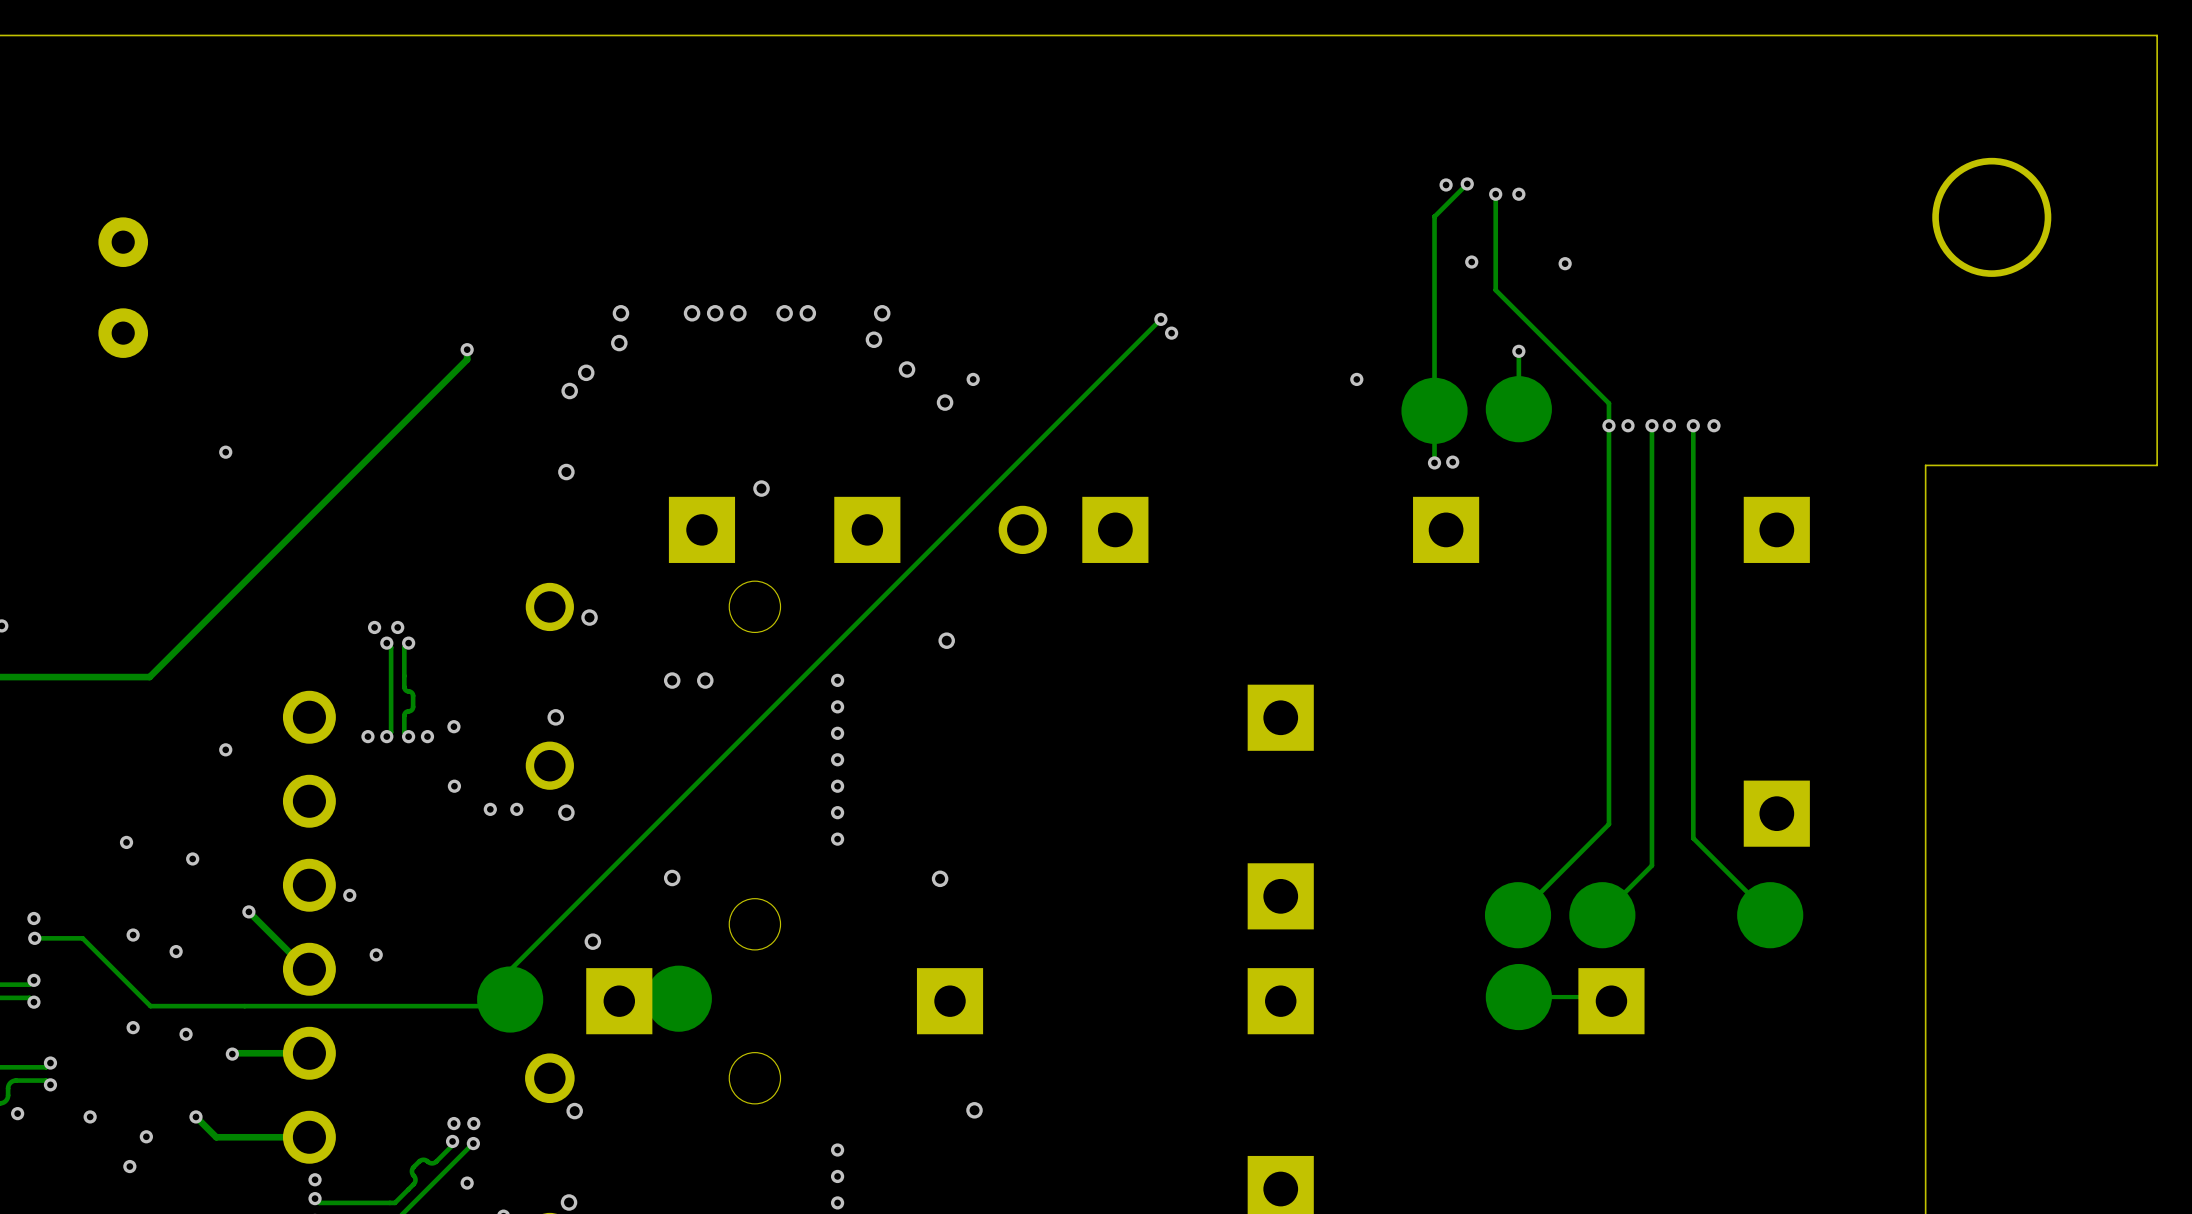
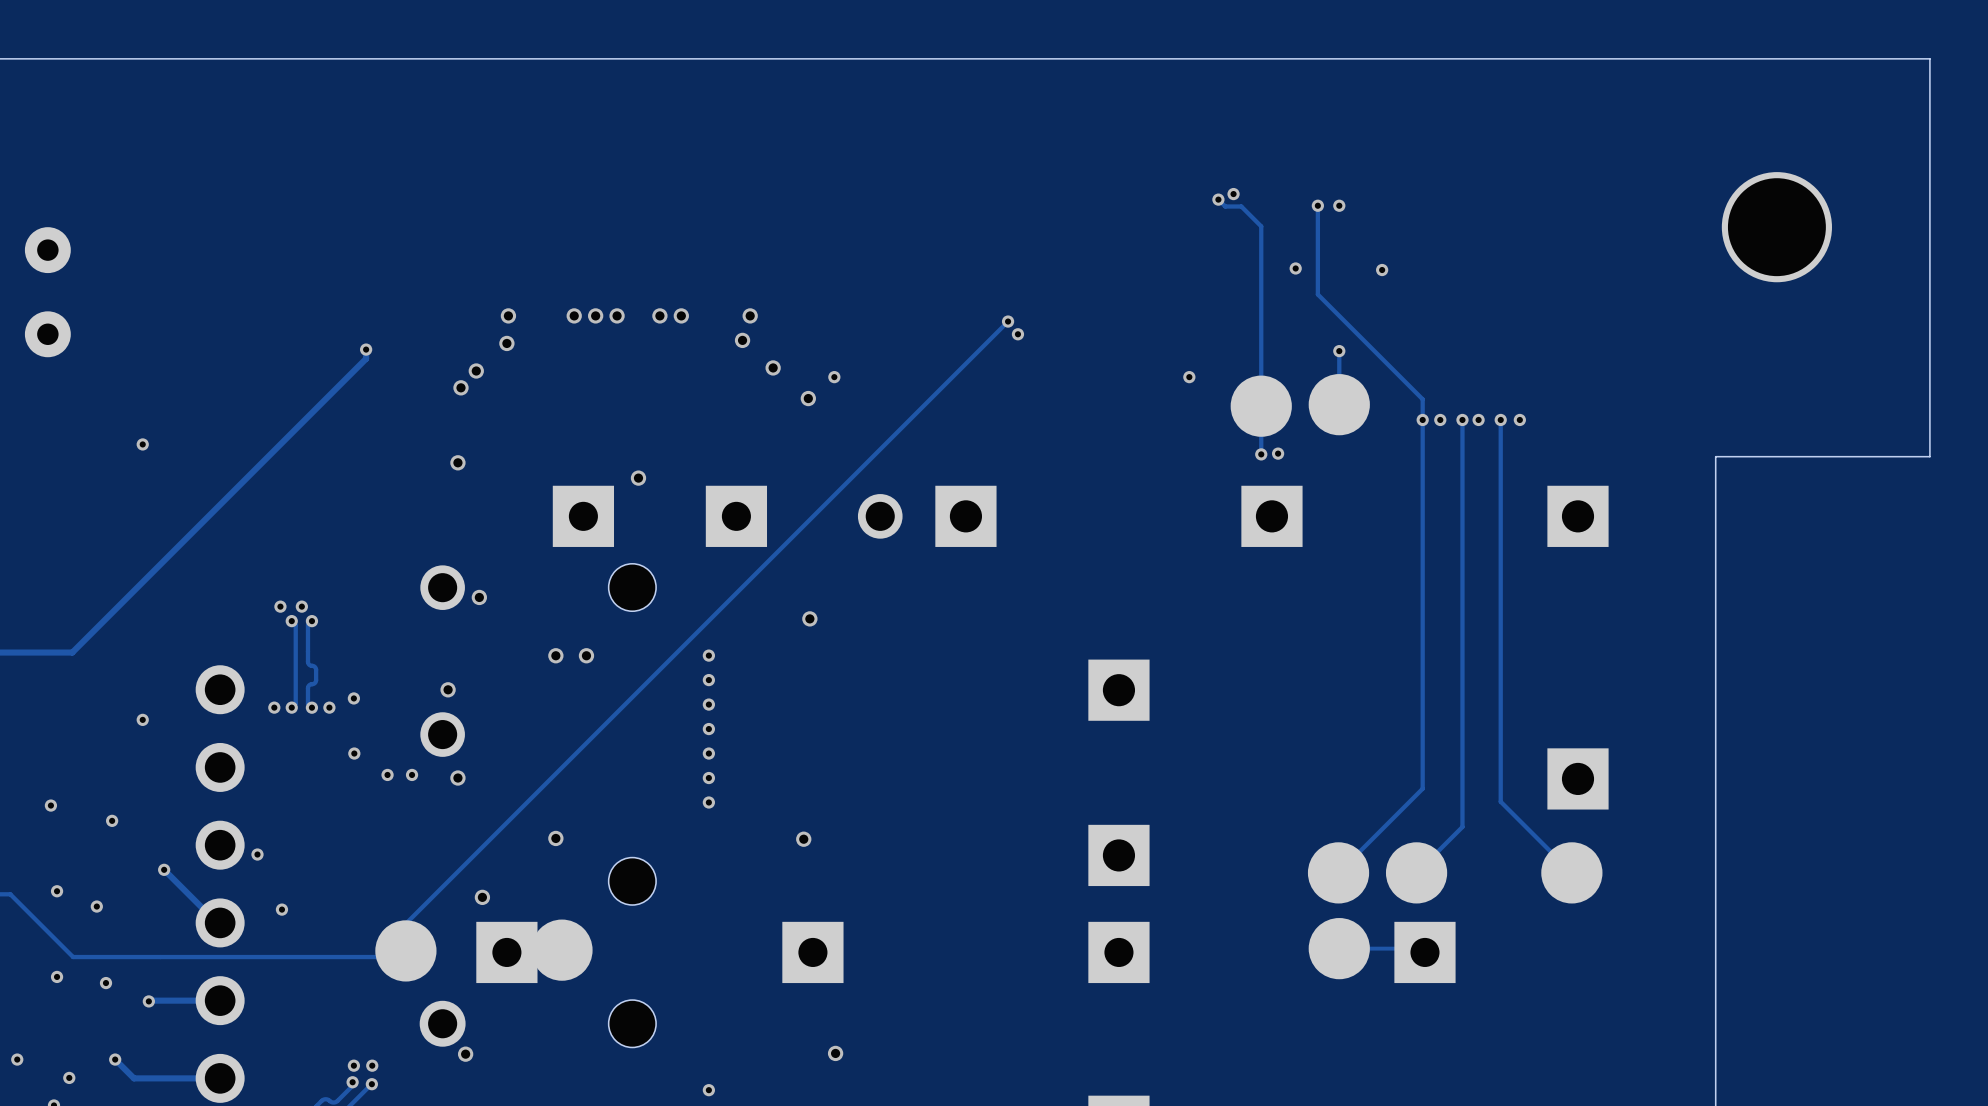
via: none -> (1233, 194)
track: (1467, 183) (1434, 216) -> (1218, 199) (1225, 206) (1241, 206) (1261, 226)
via: (1467, 183) -> none
via: (1446, 184) -> none
via: none -> (1218, 199)

